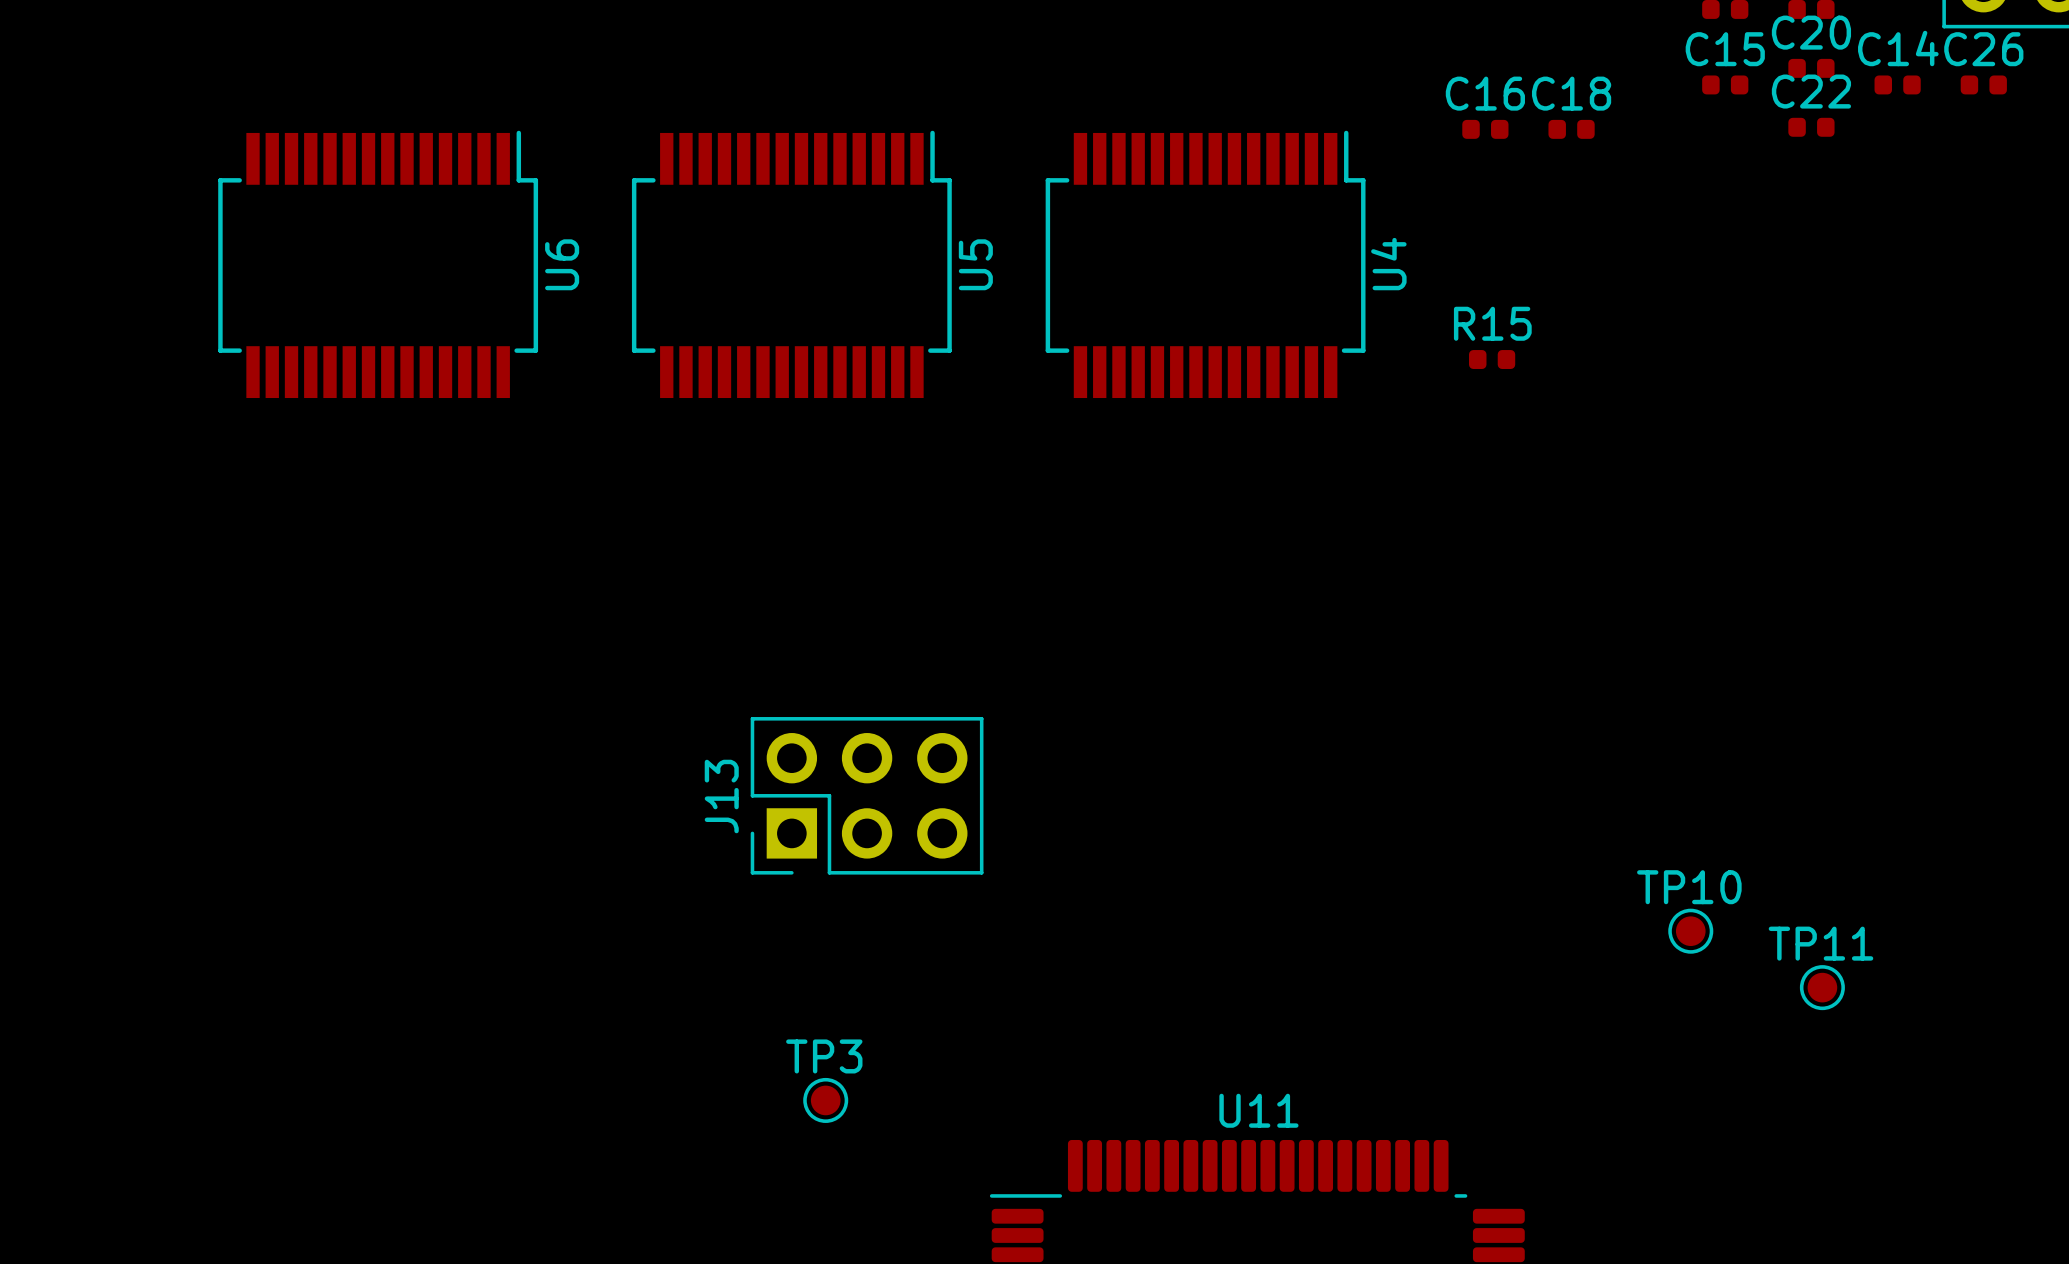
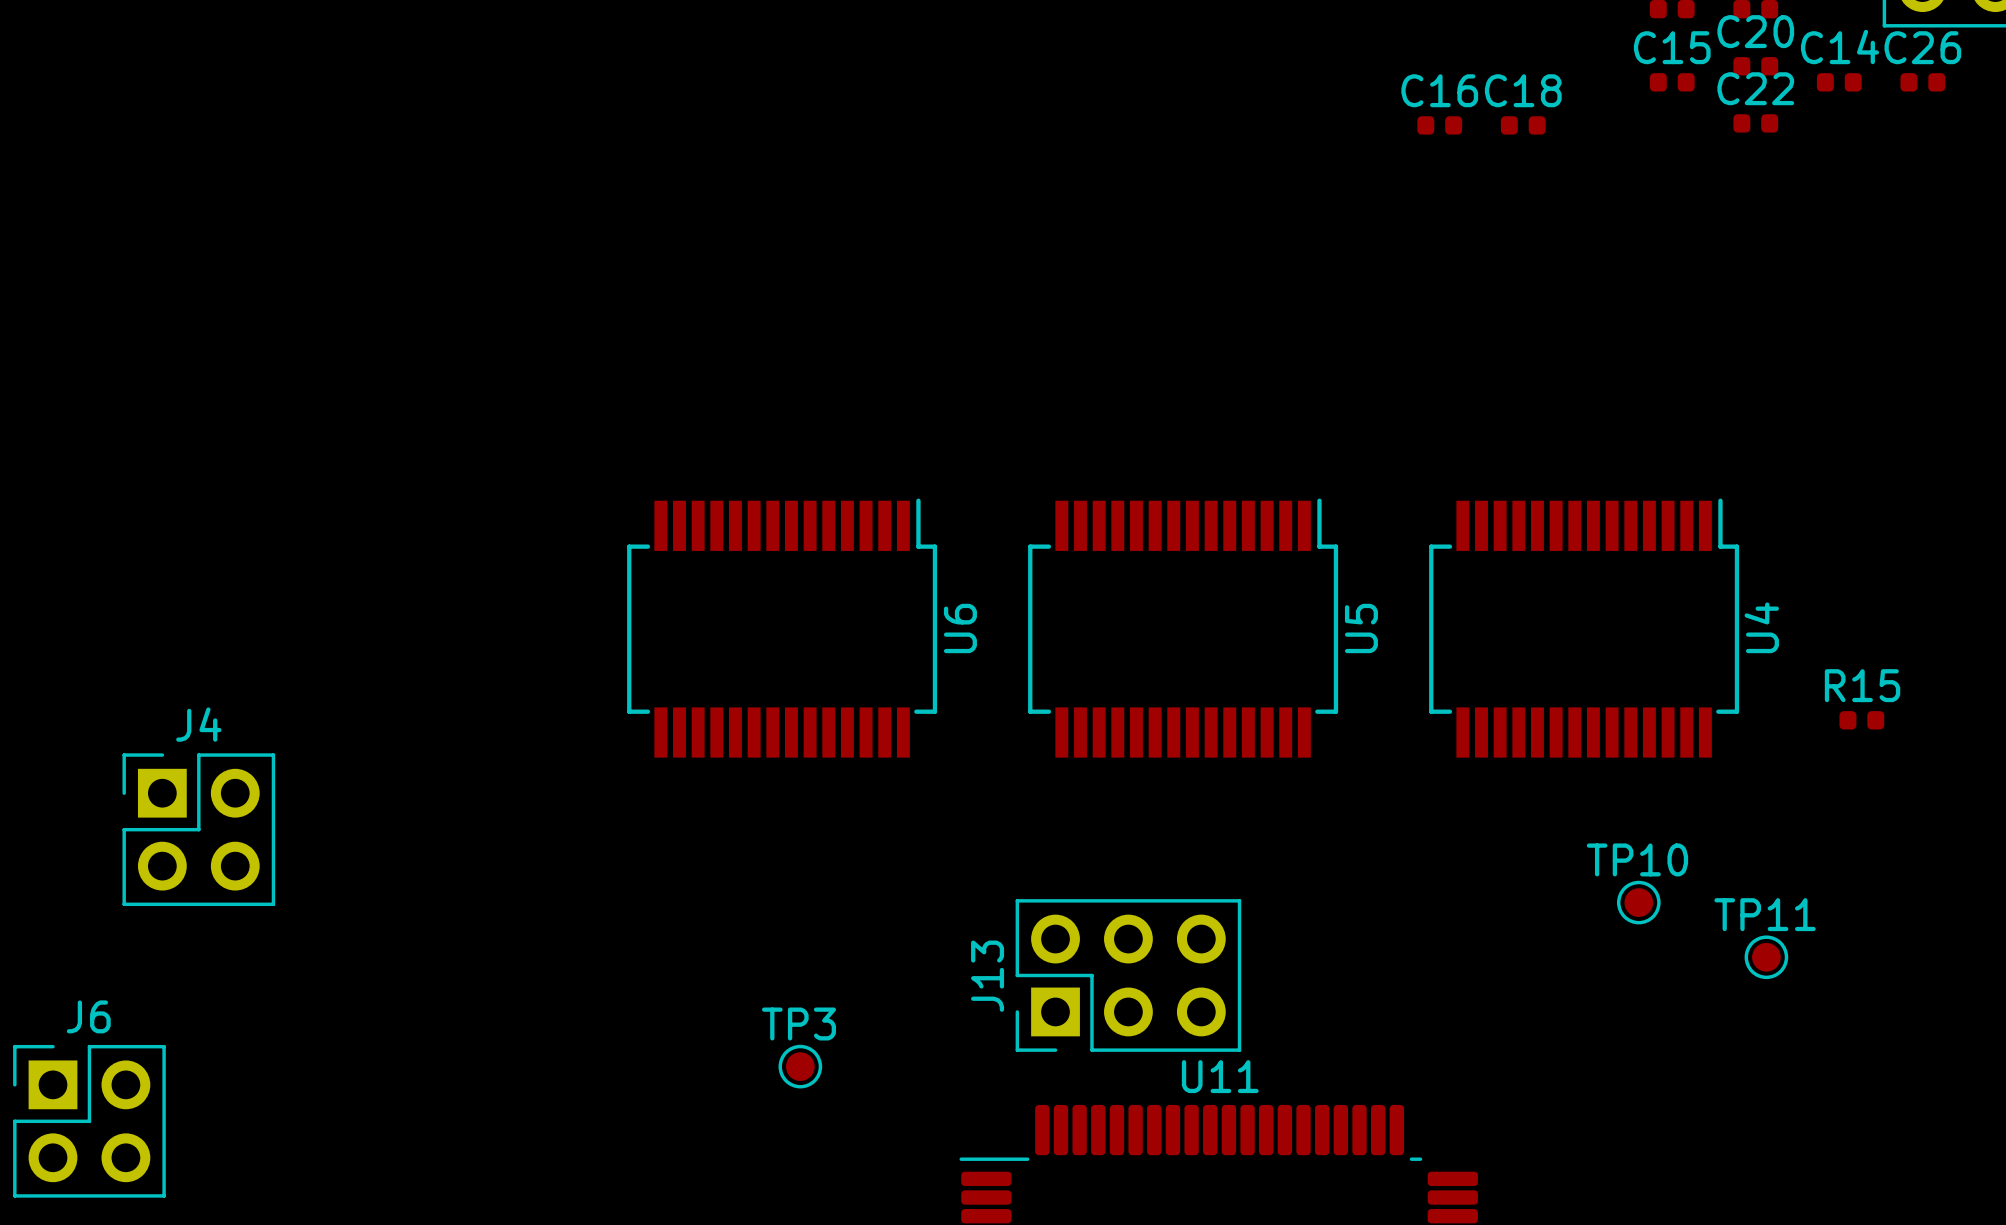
U6 position: (378, 264) -> (782, 628)
U5 position: (791, 264) -> (1183, 628)
U4 position: (1205, 264) -> (1584, 628)
R15 position: (1492, 359) -> (1861, 720)
J13 position: (867, 795) -> (1128, 975)
J4: none -> (198, 829)
J6: none -> (89, 1121)

